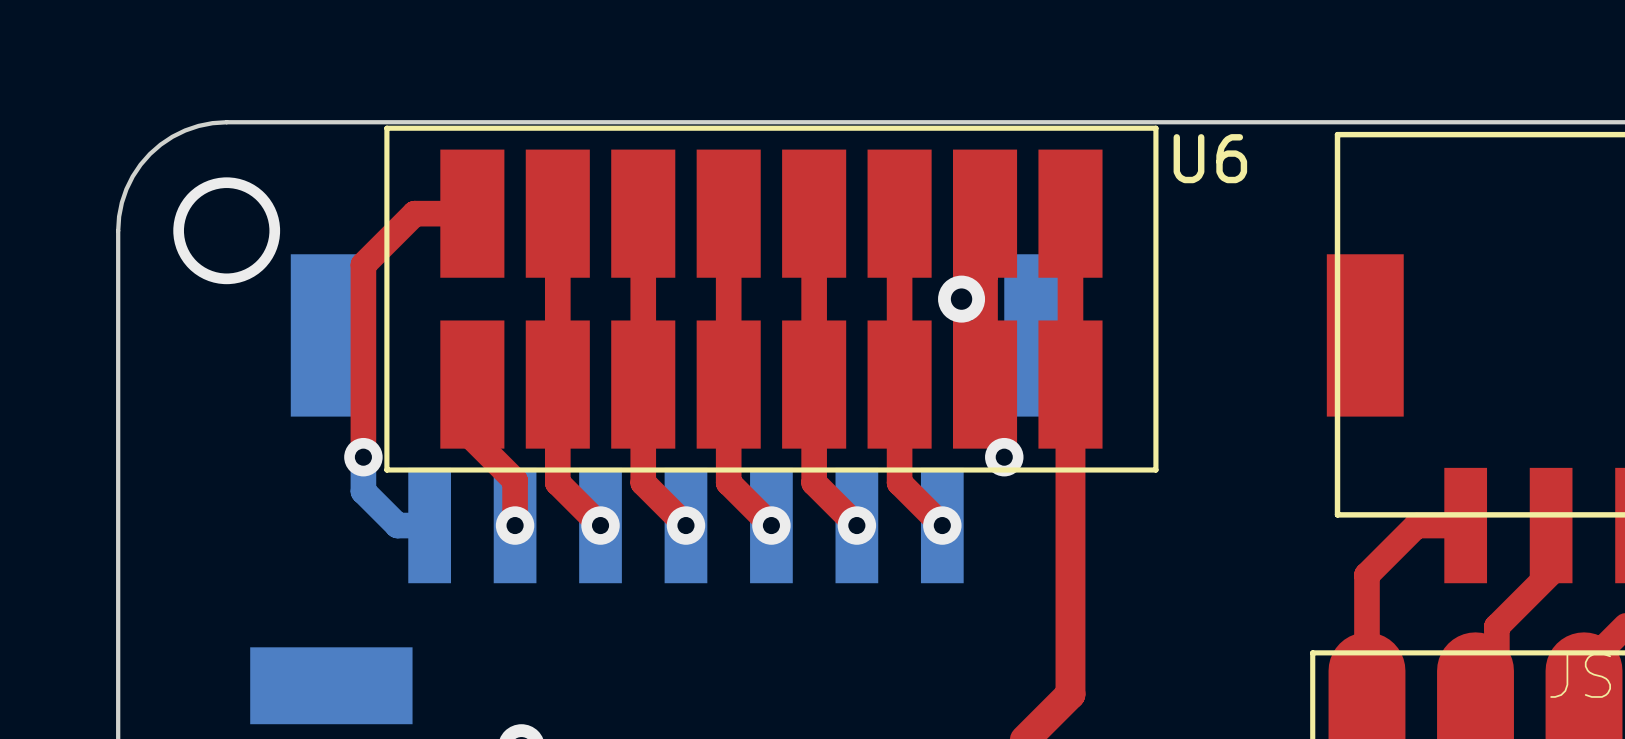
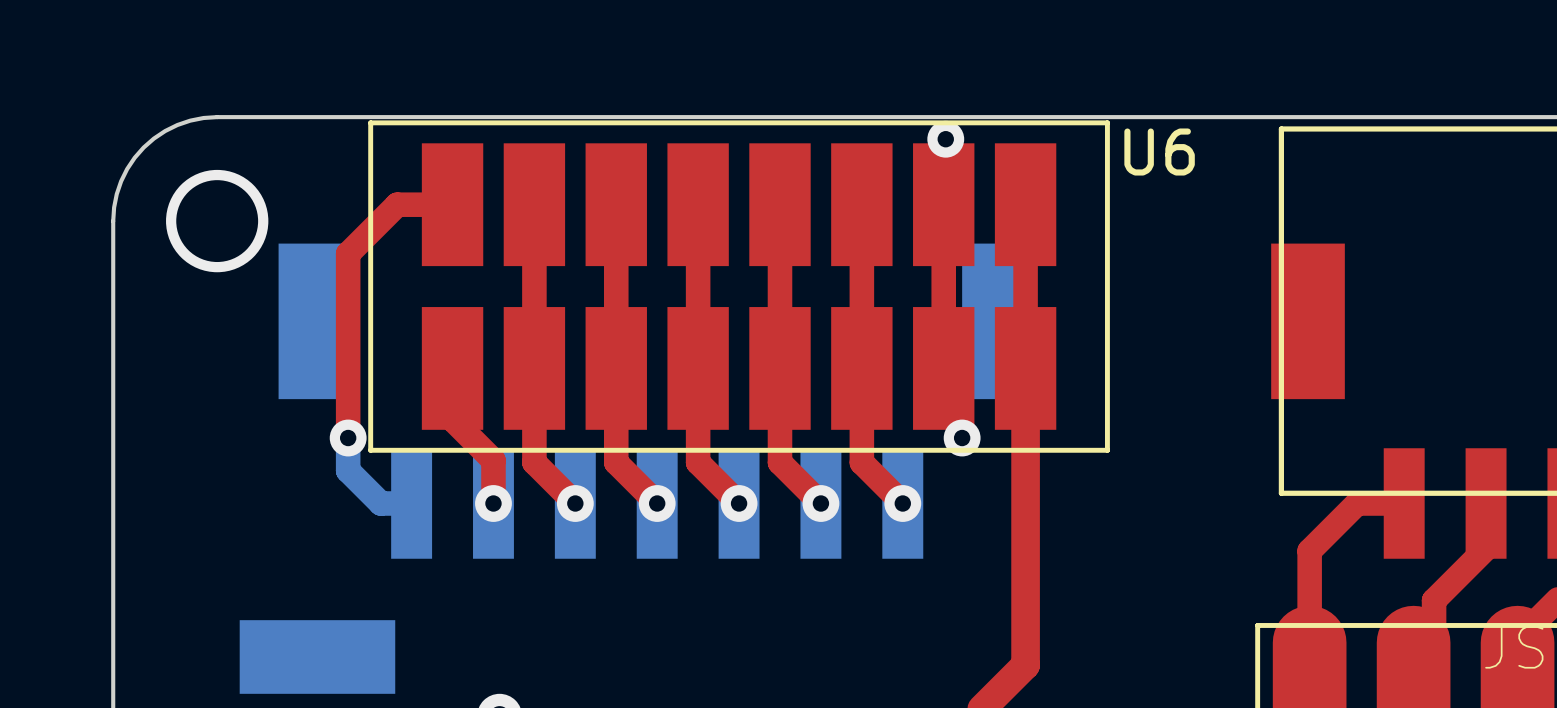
via: none -> (945, 139)
via: (961, 299) -> none

